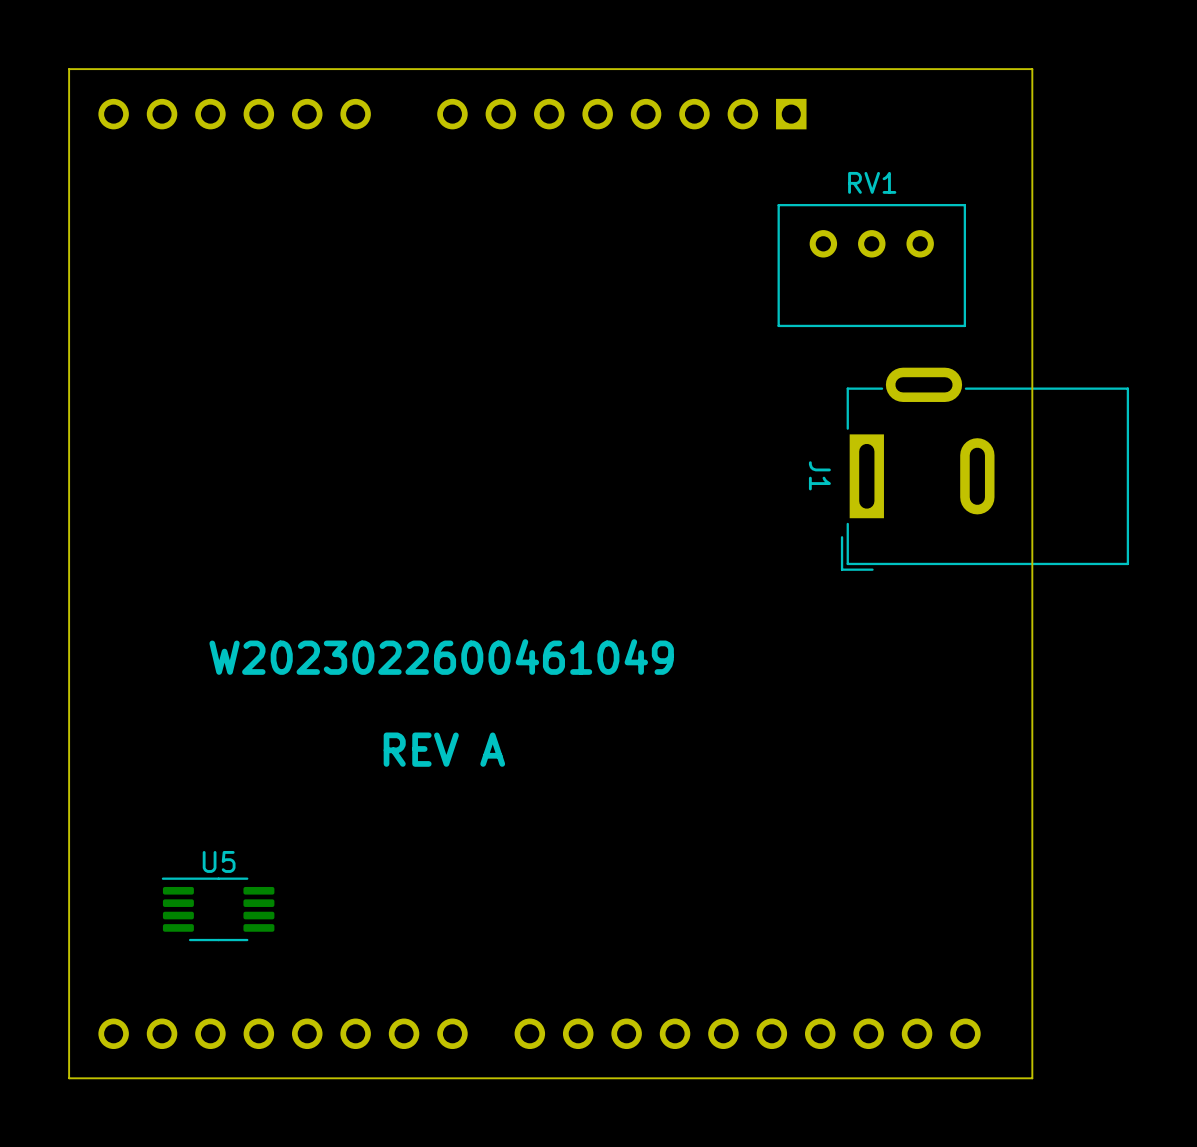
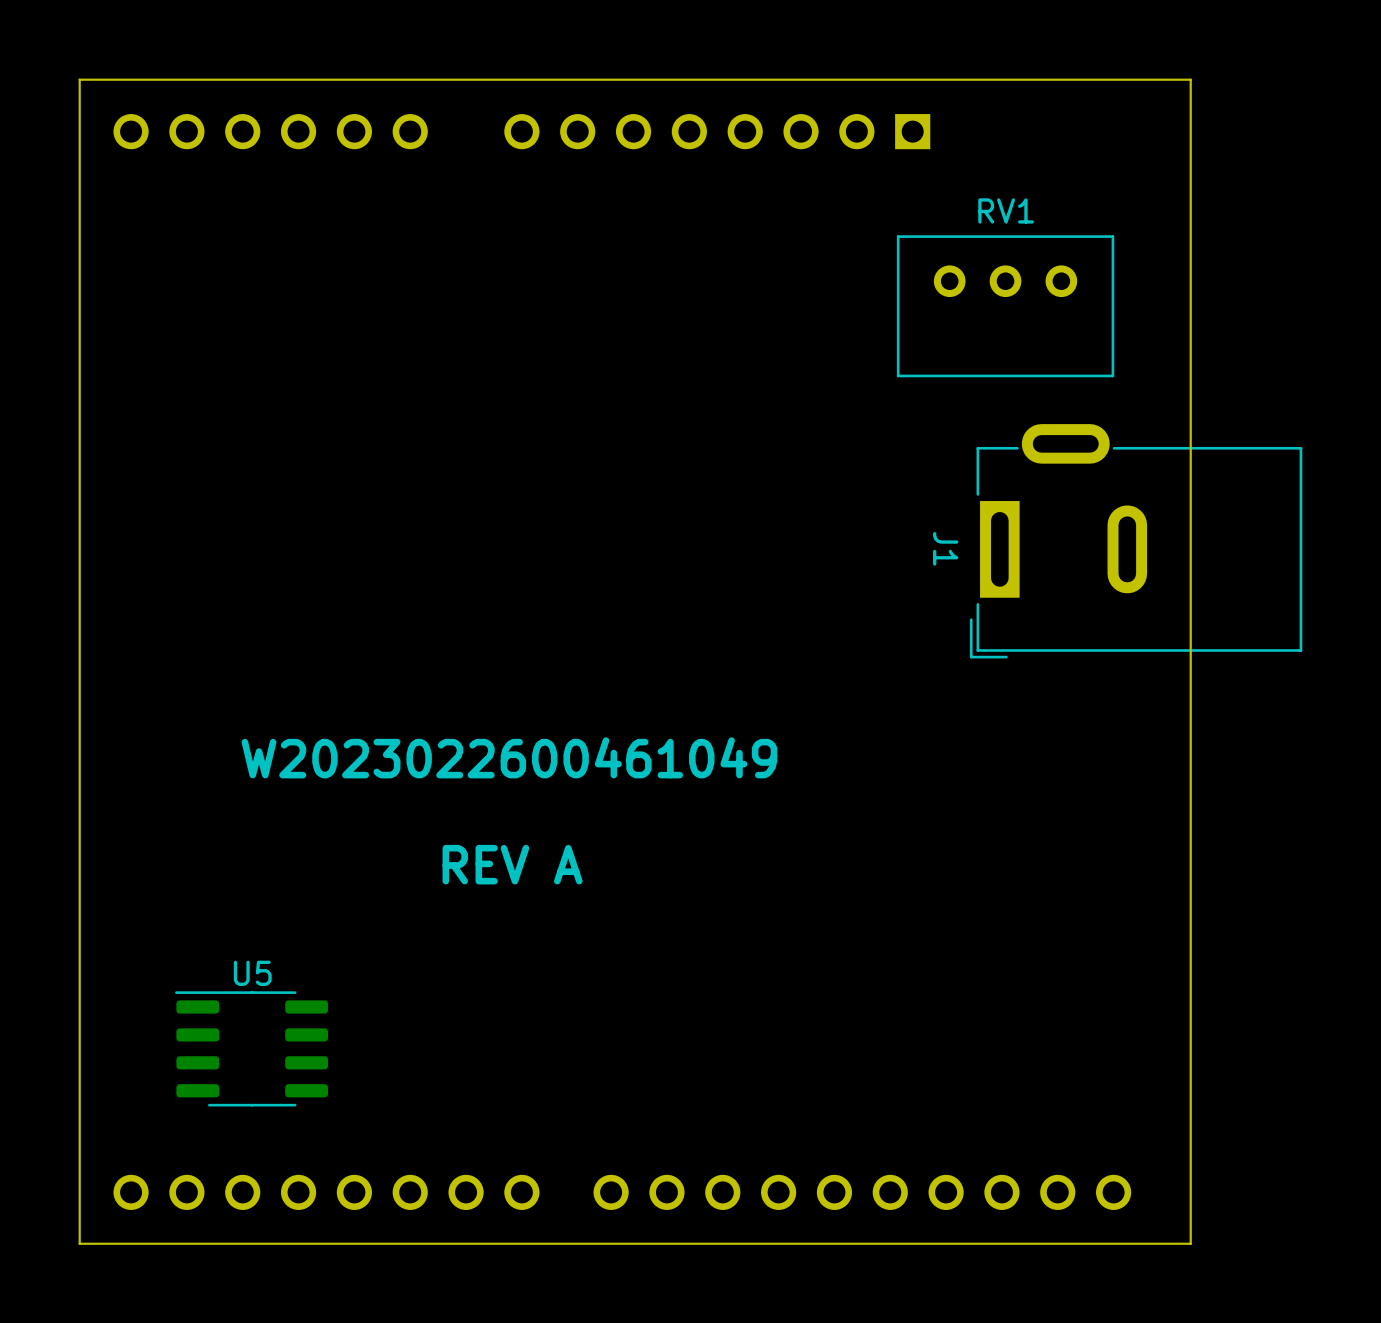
U5 footprint: [161, 877, 275, 942] -> [175, 991, 329, 1107]

